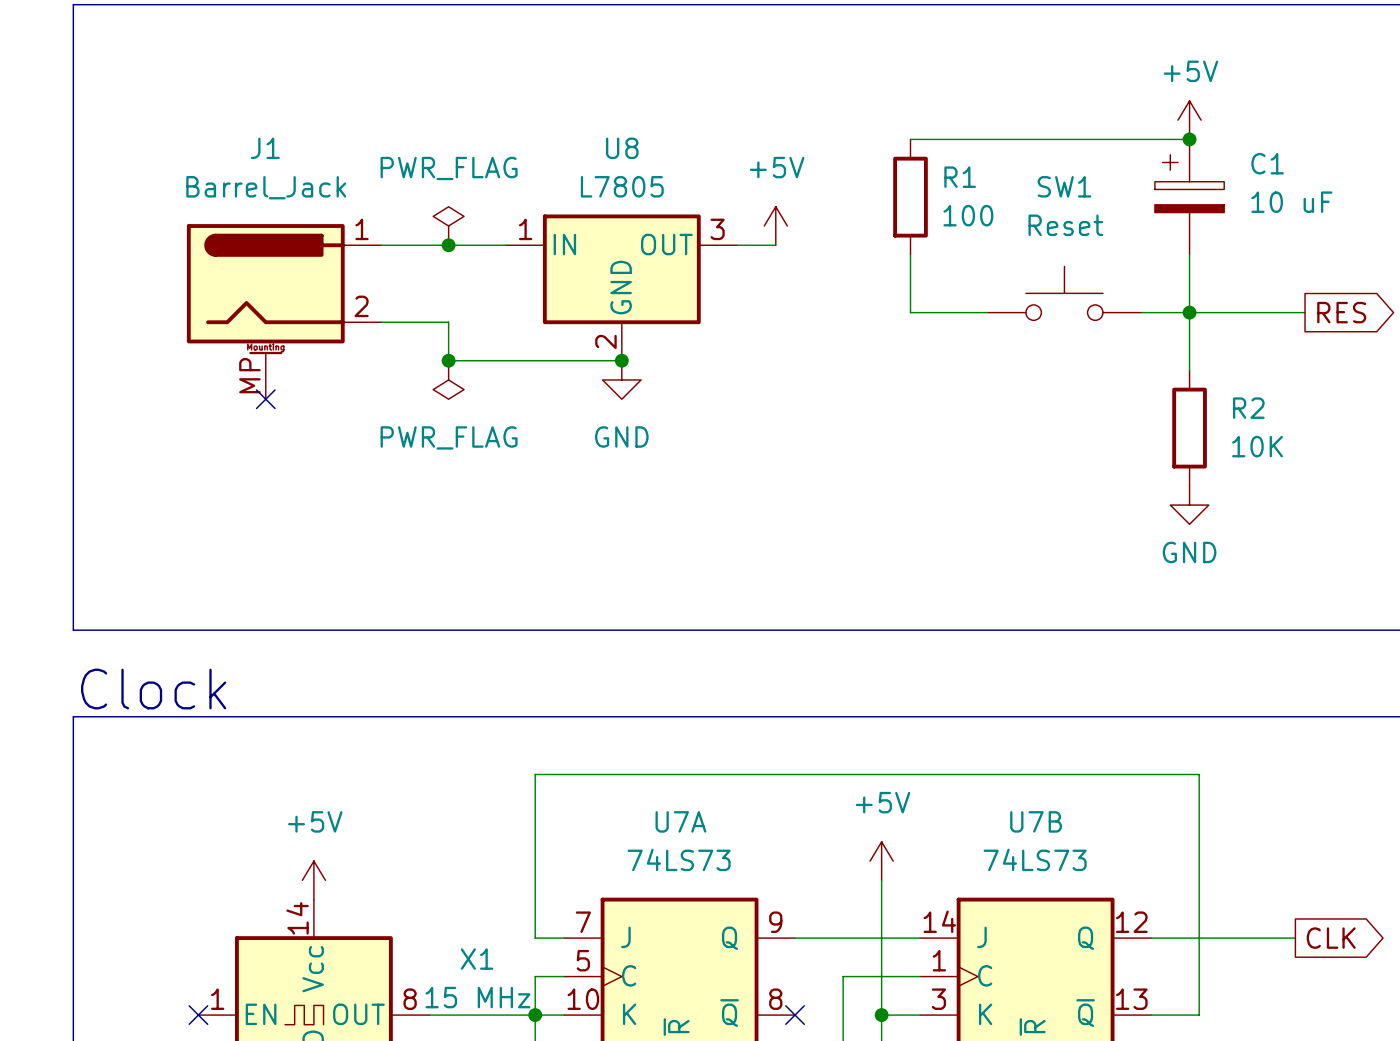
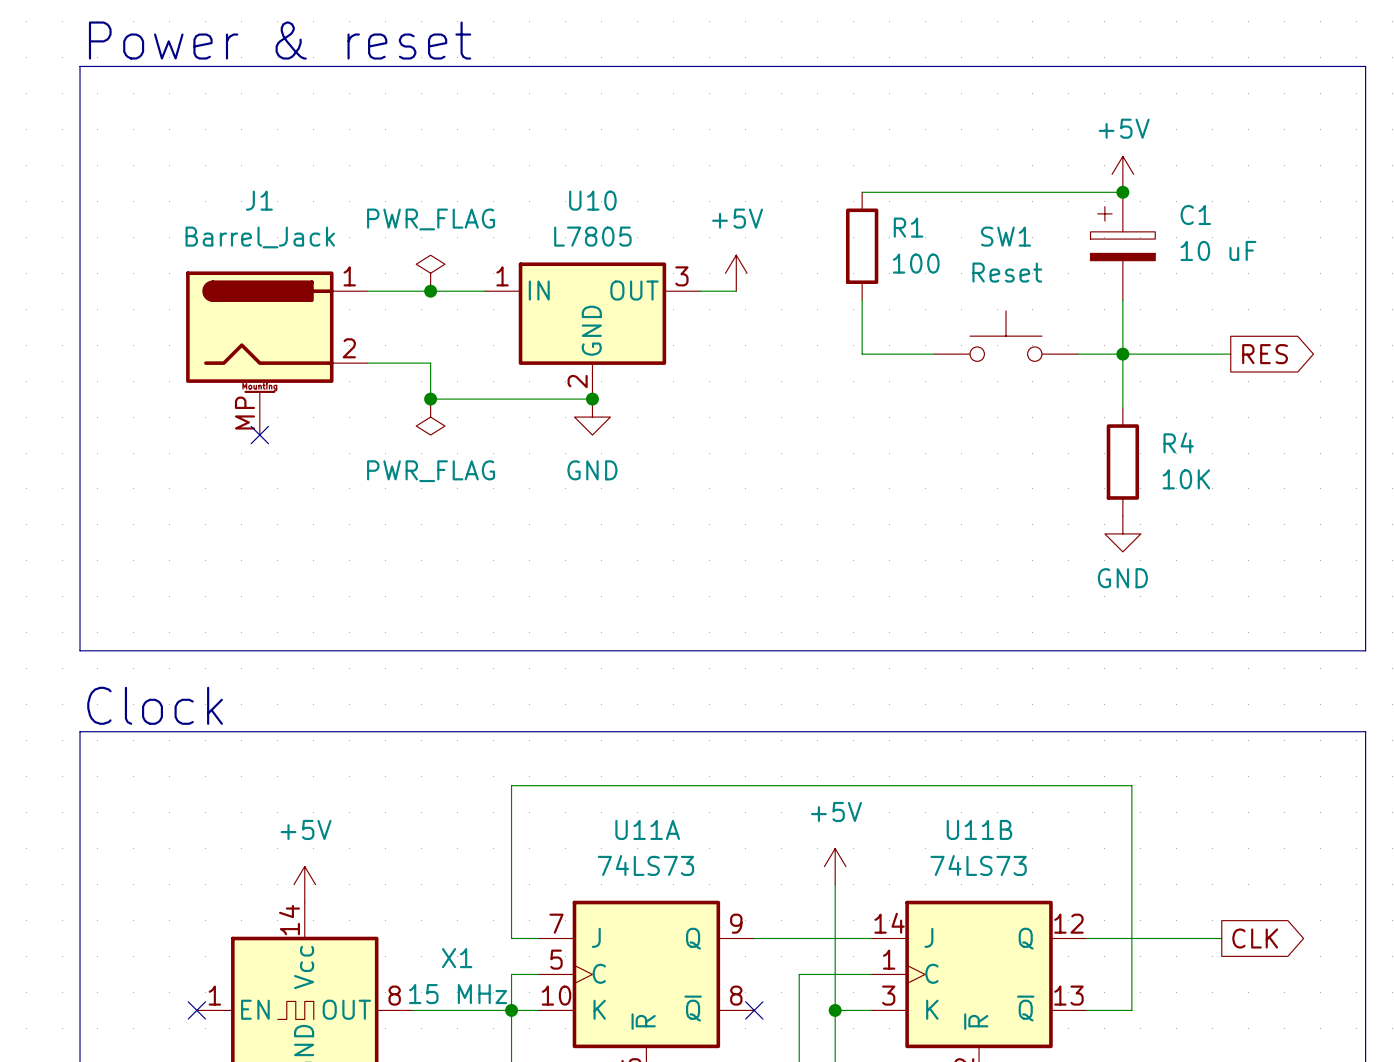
U8 name: U8 (622, 148) -> U10 (592, 200)
R2 name: R2 (1248, 408) -> R4 (1178, 442)
U7A name: U7A (680, 821) -> U11A (647, 829)
U7B name: U7B (1036, 821) -> U11B (979, 829)

